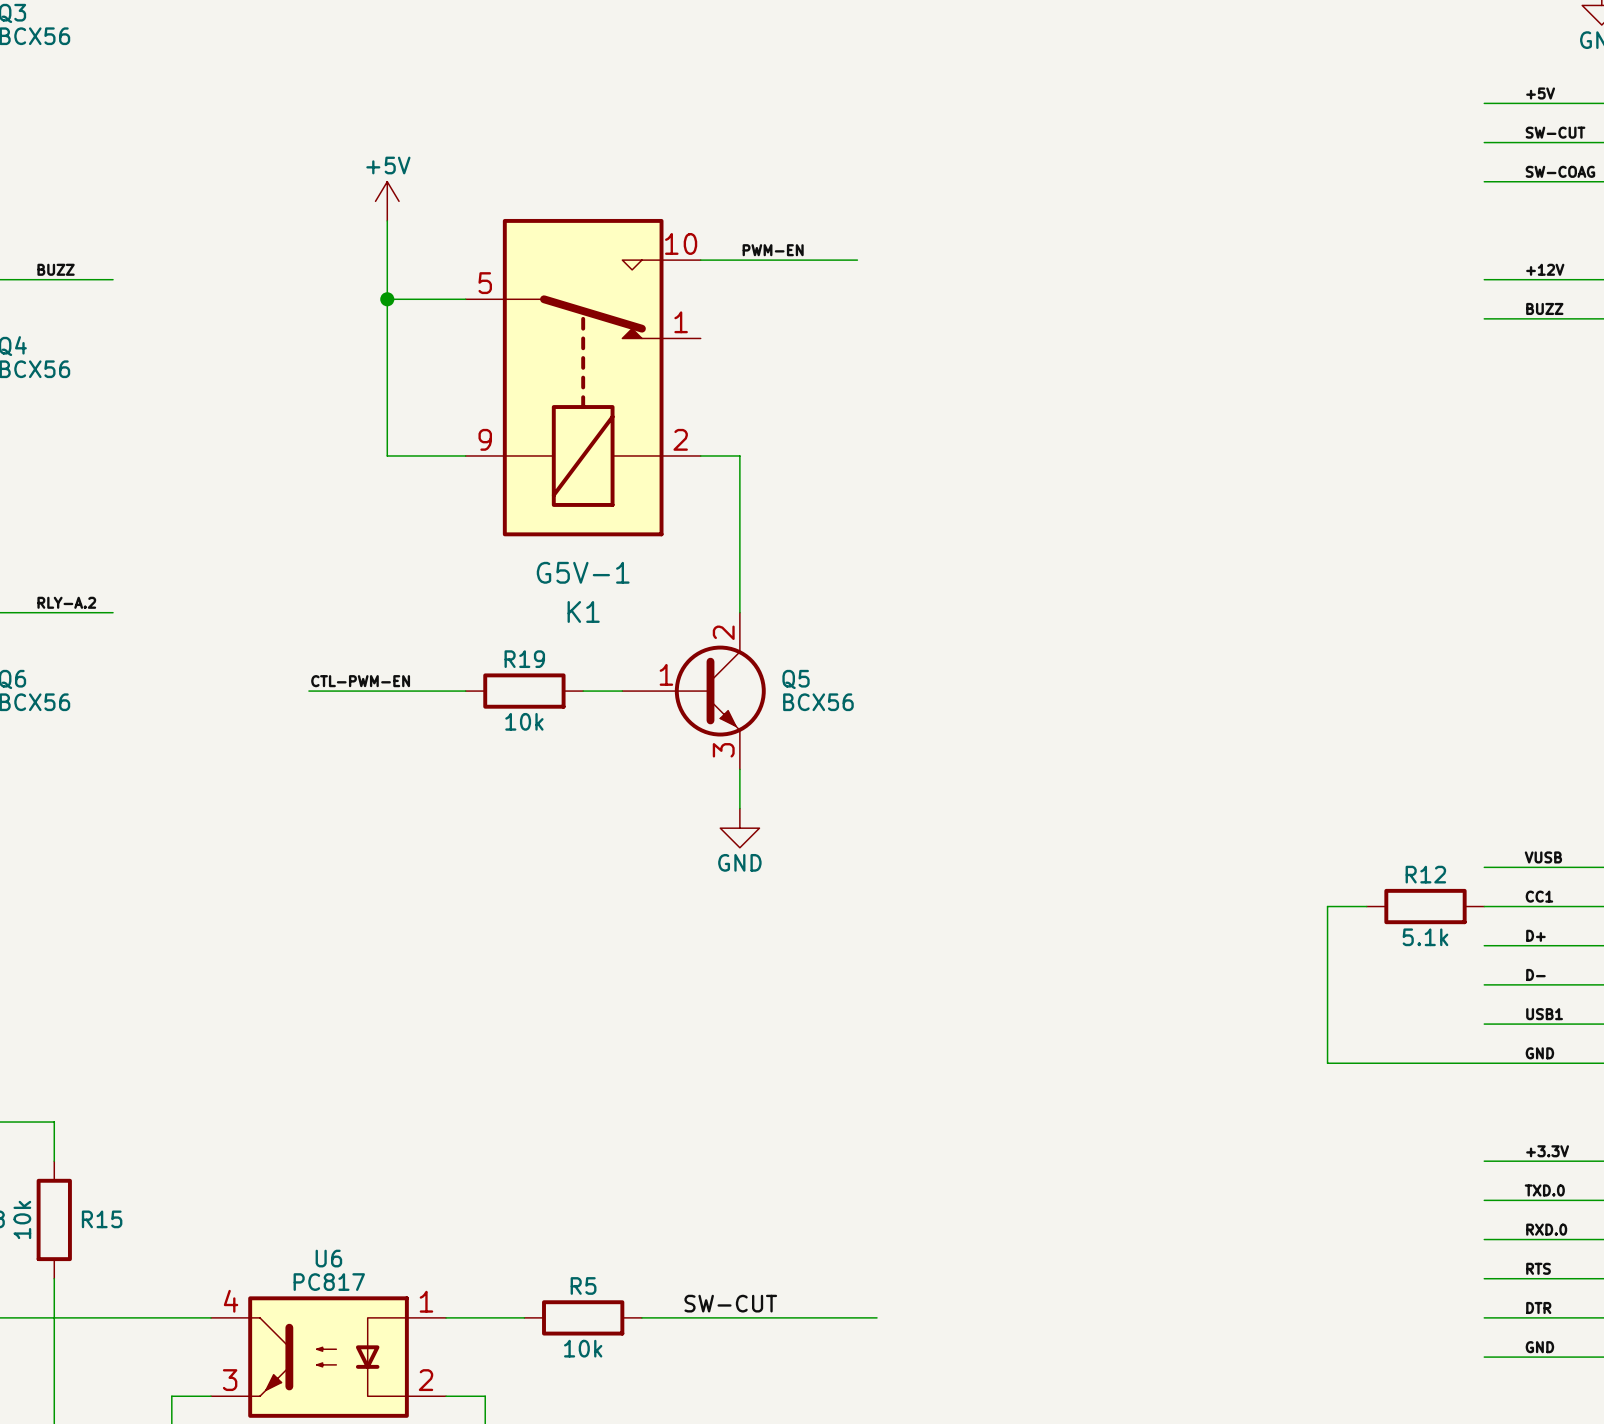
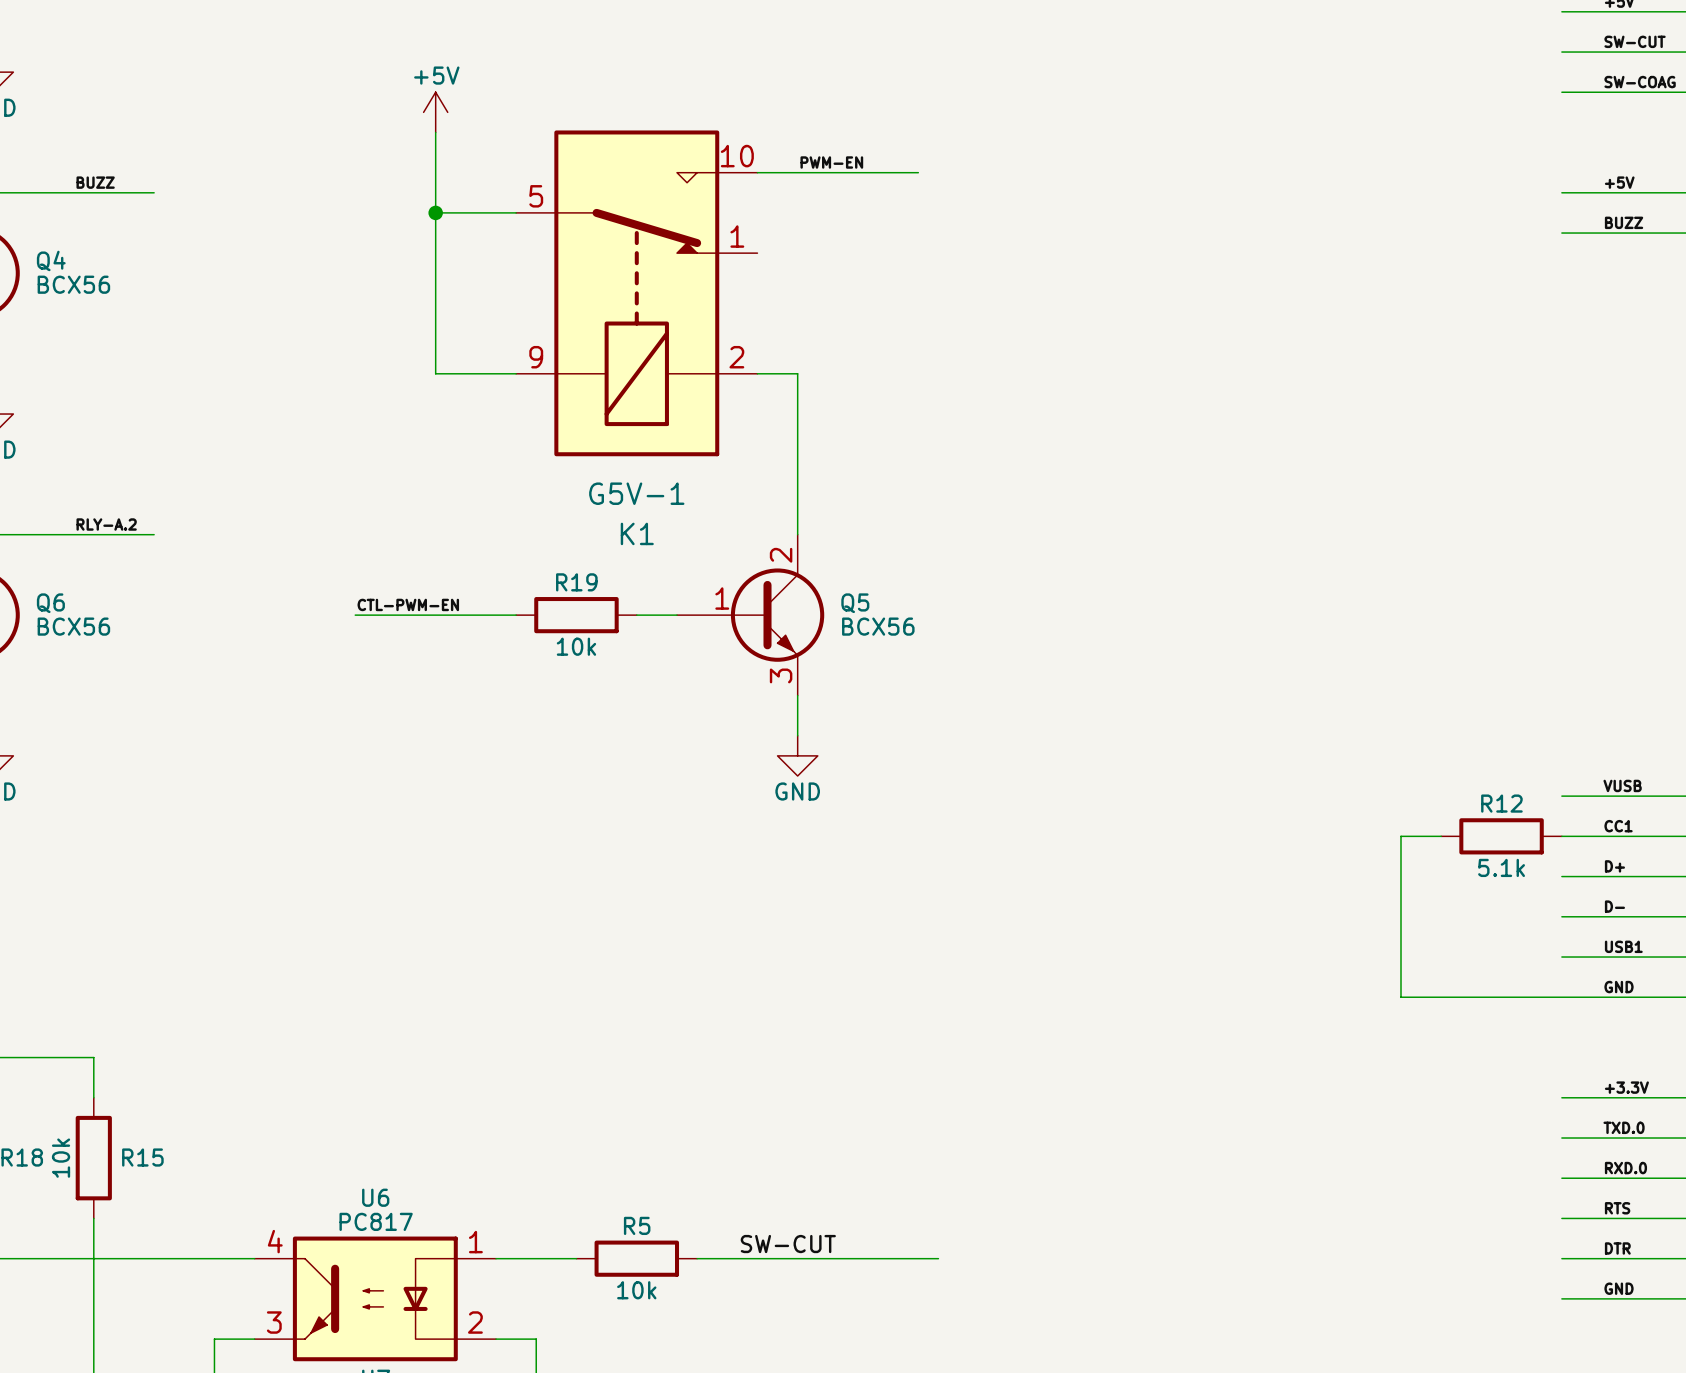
label: +12V (1545, 269) -> +5V (1619, 182)

